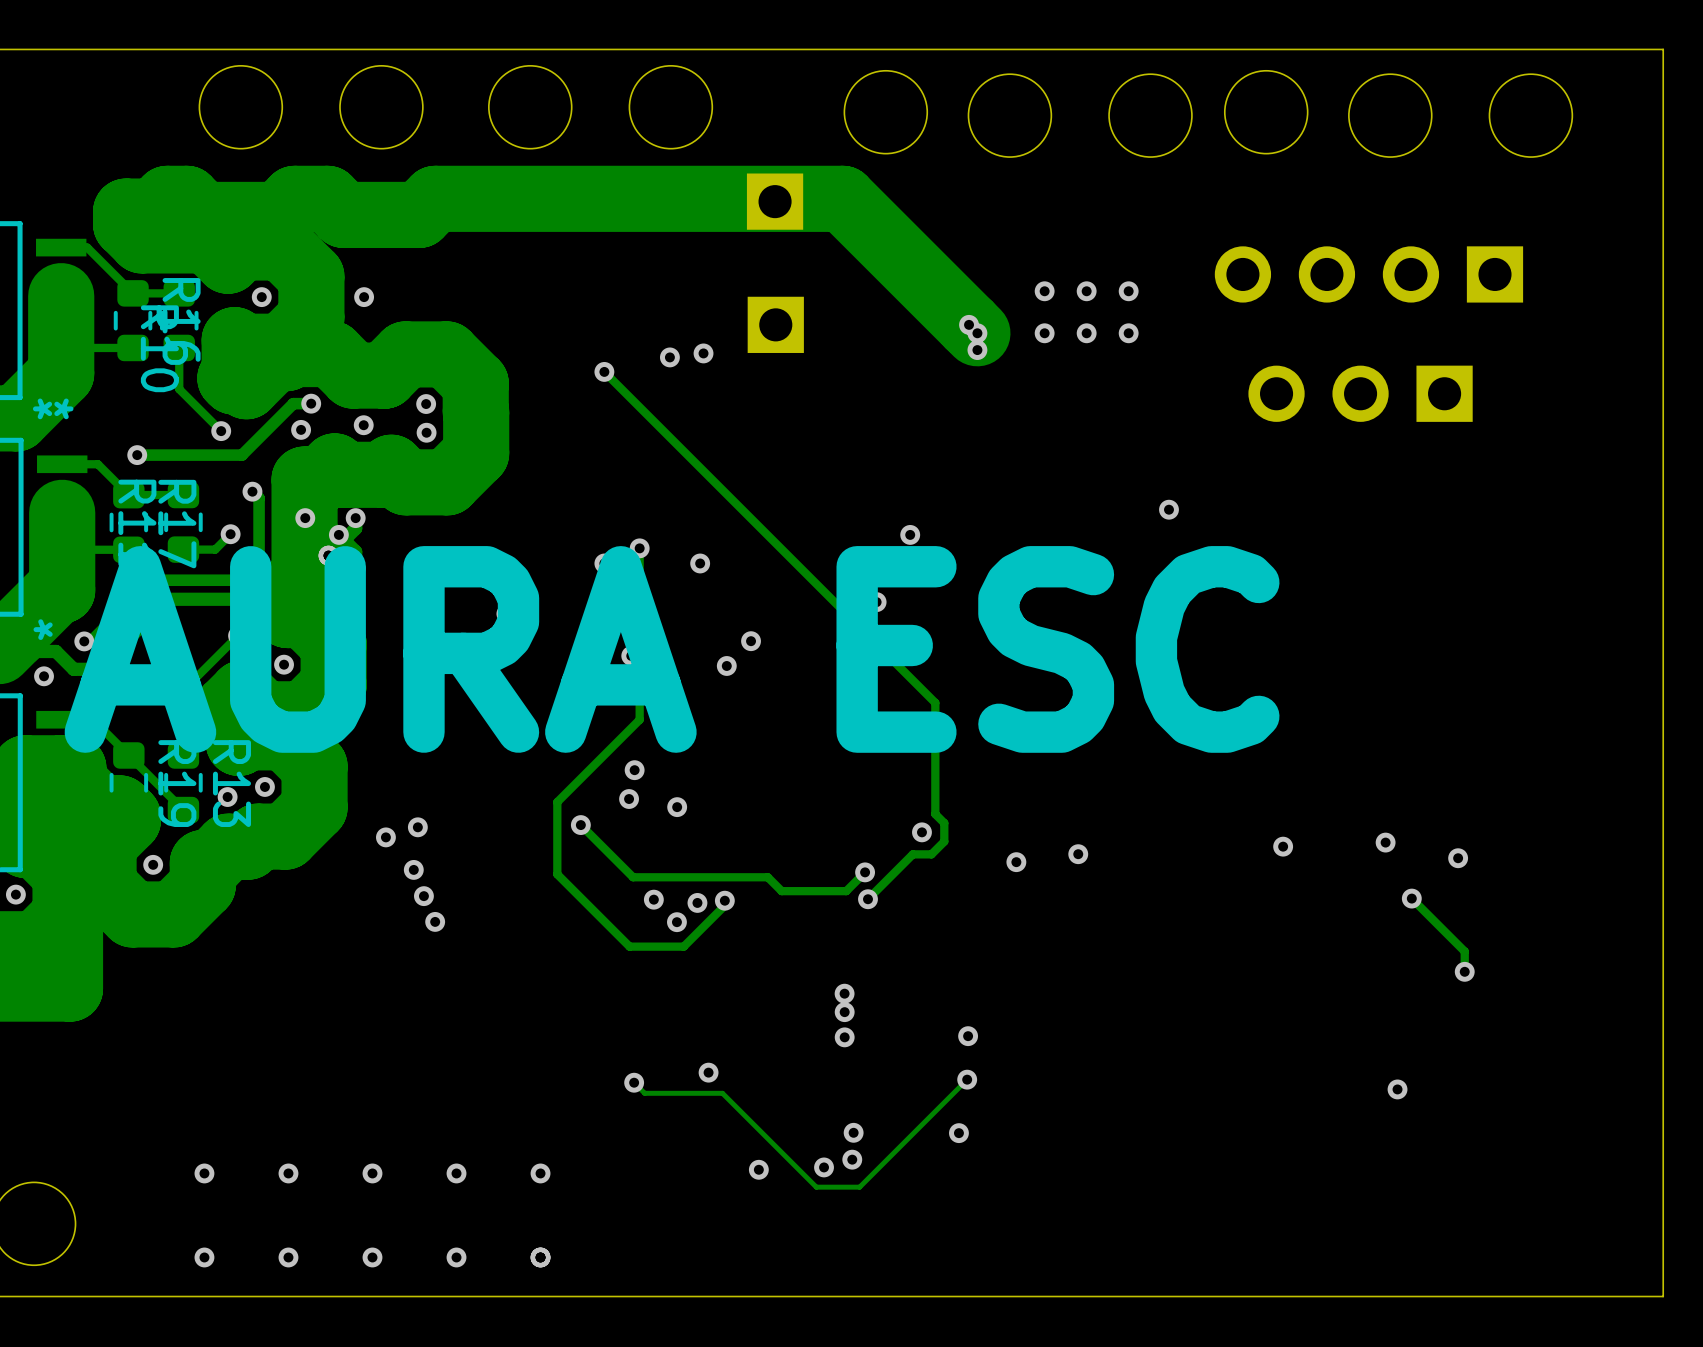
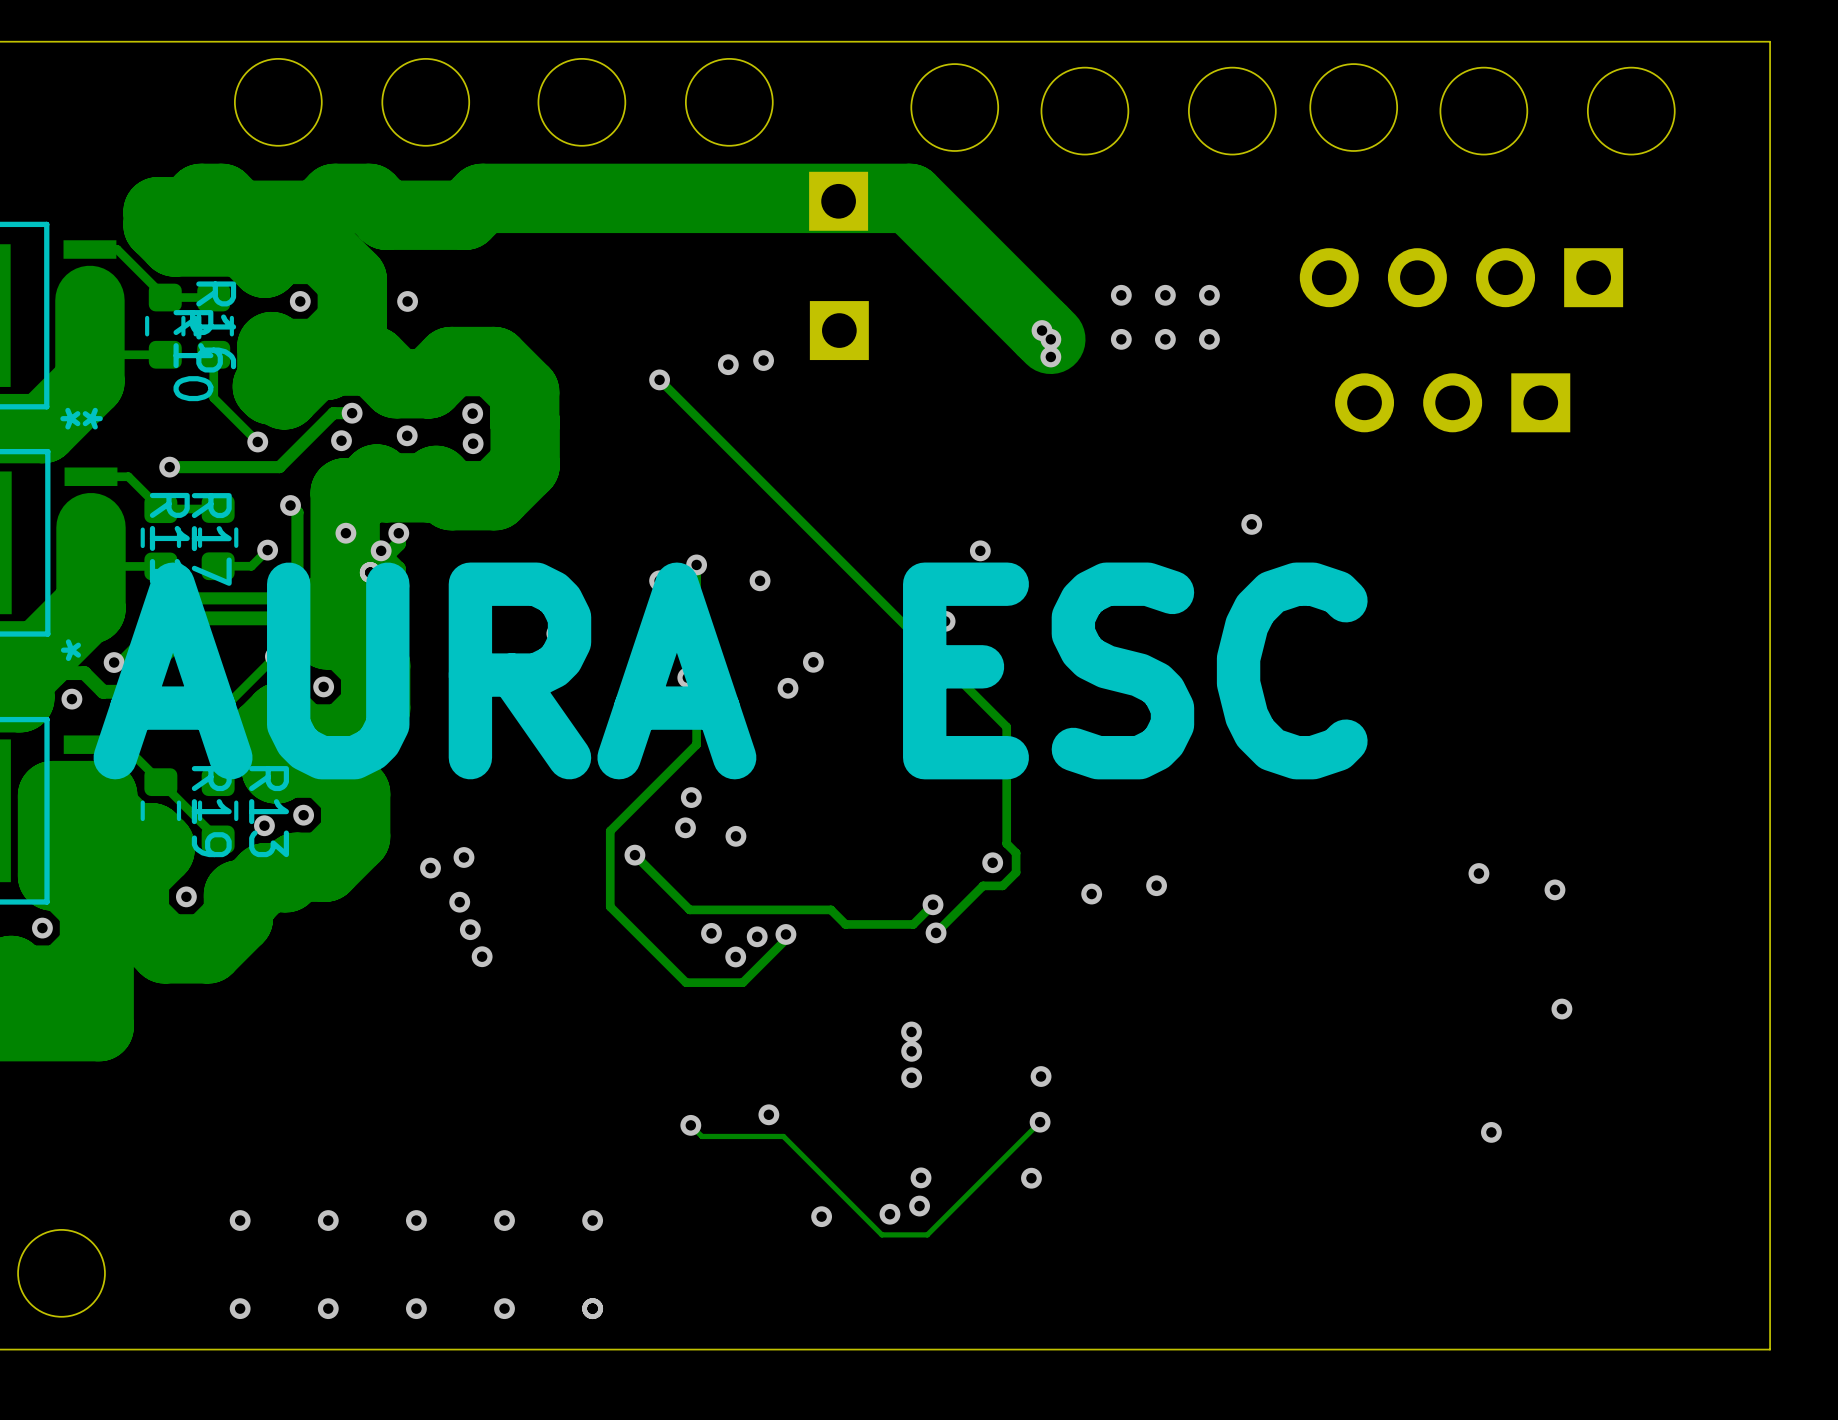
via: (1283, 846) -> none
track: (1411, 898) (1464, 951) (1464, 971) -> none
via: (1411, 898) -> none

